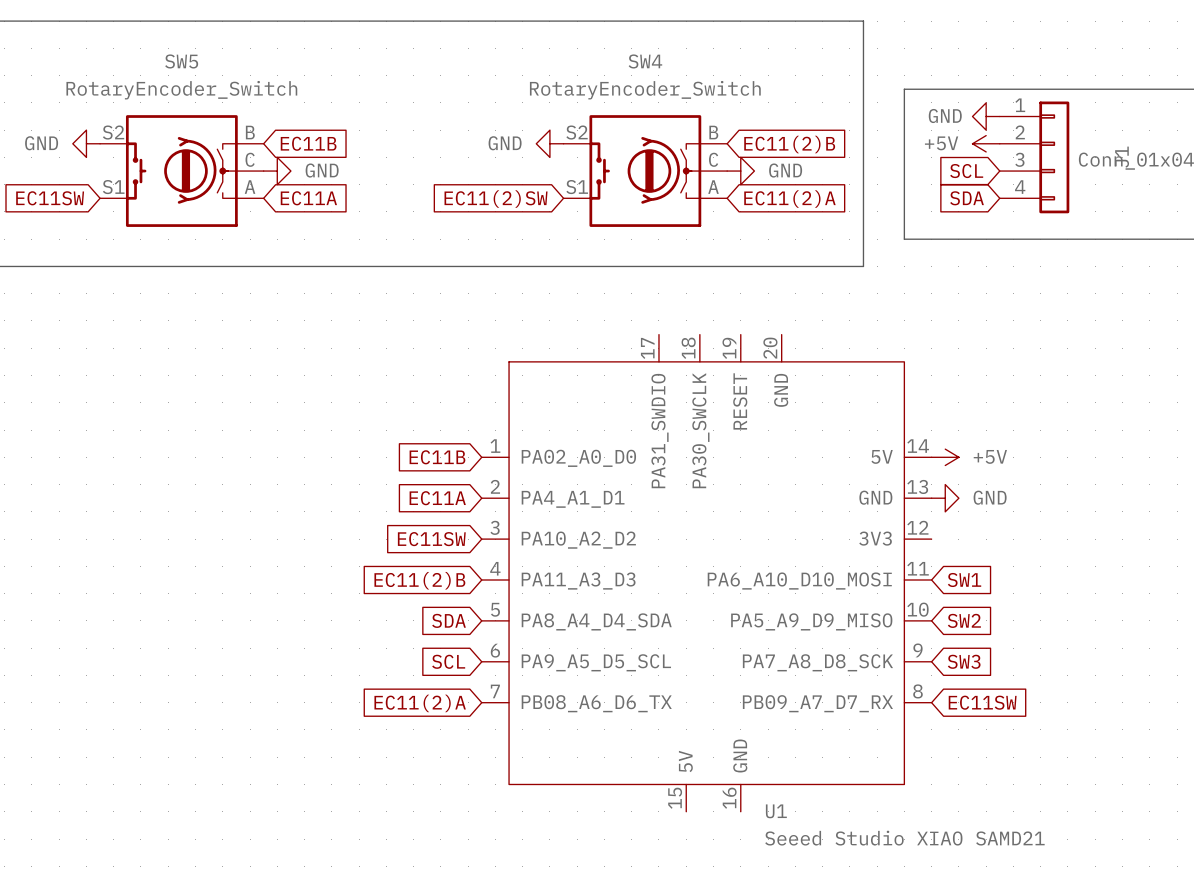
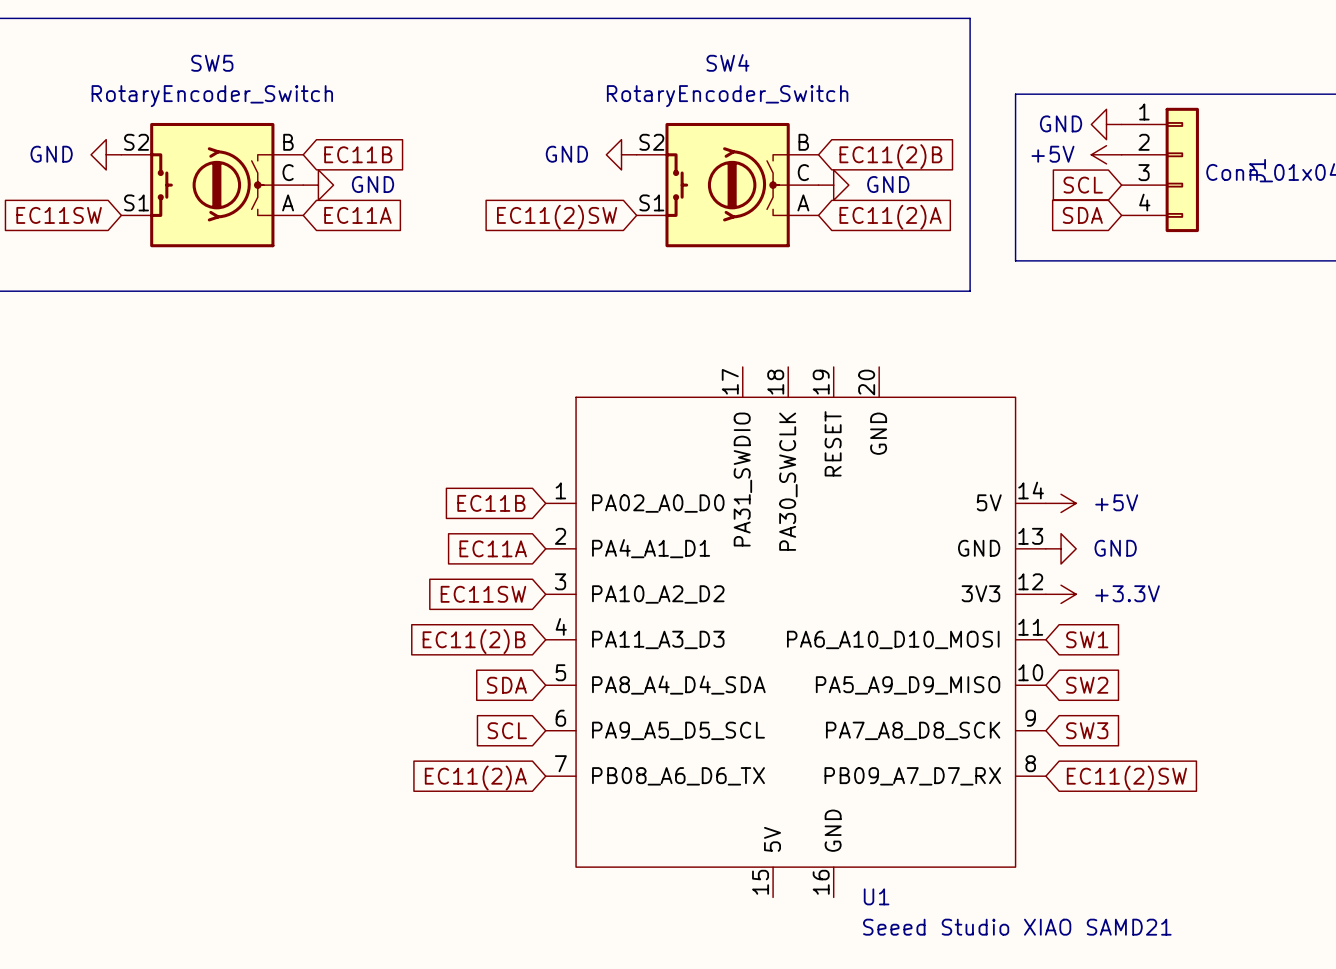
power symbol: none -> +3.3V (1061, 594)
global label: EC11SW (982, 702) -> EC11(2)SW (1126, 777)

